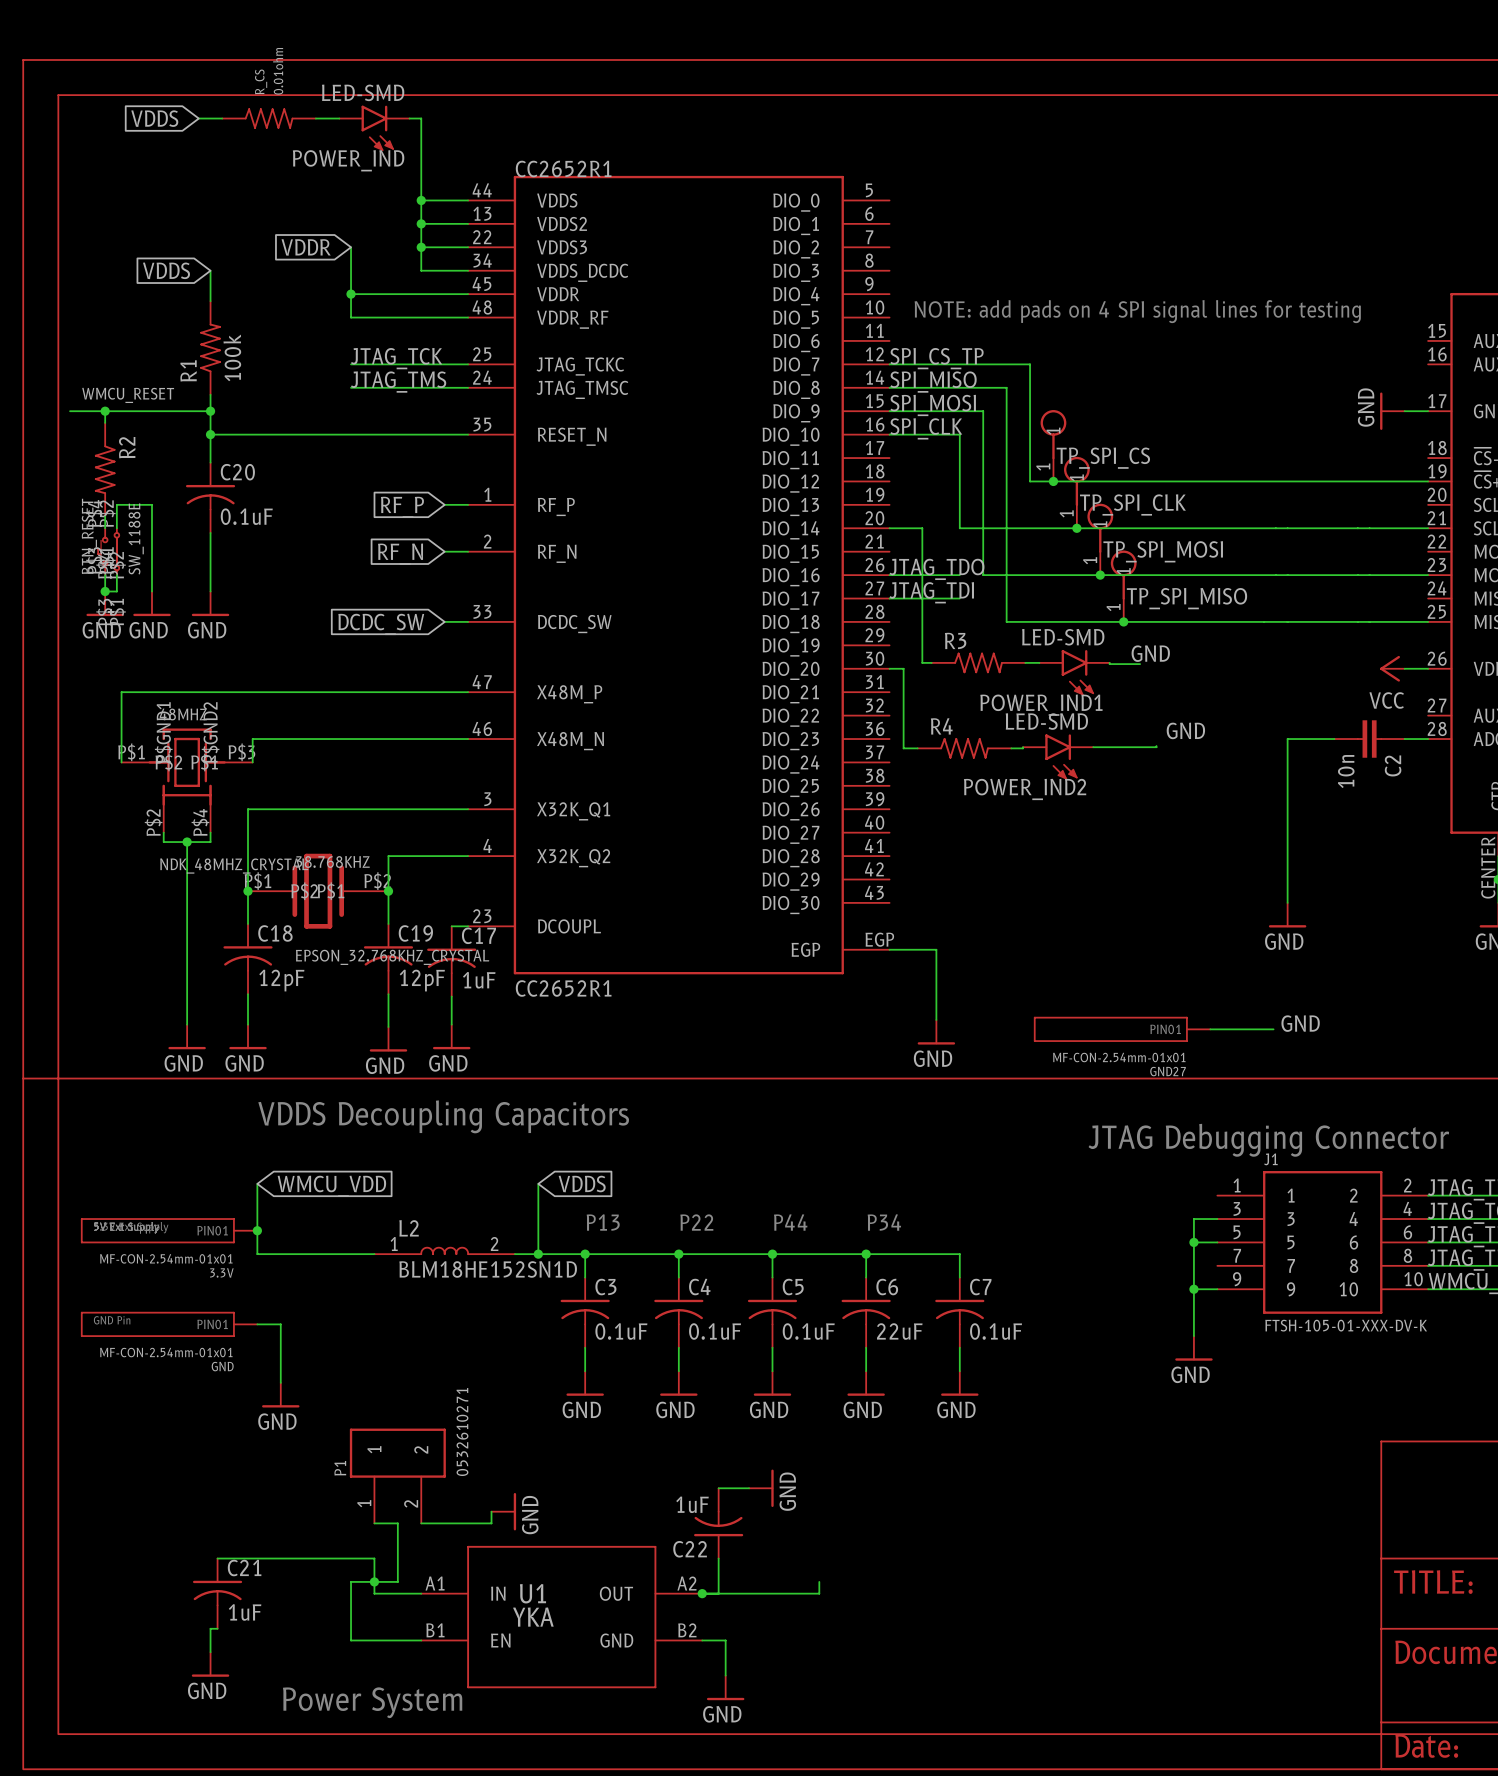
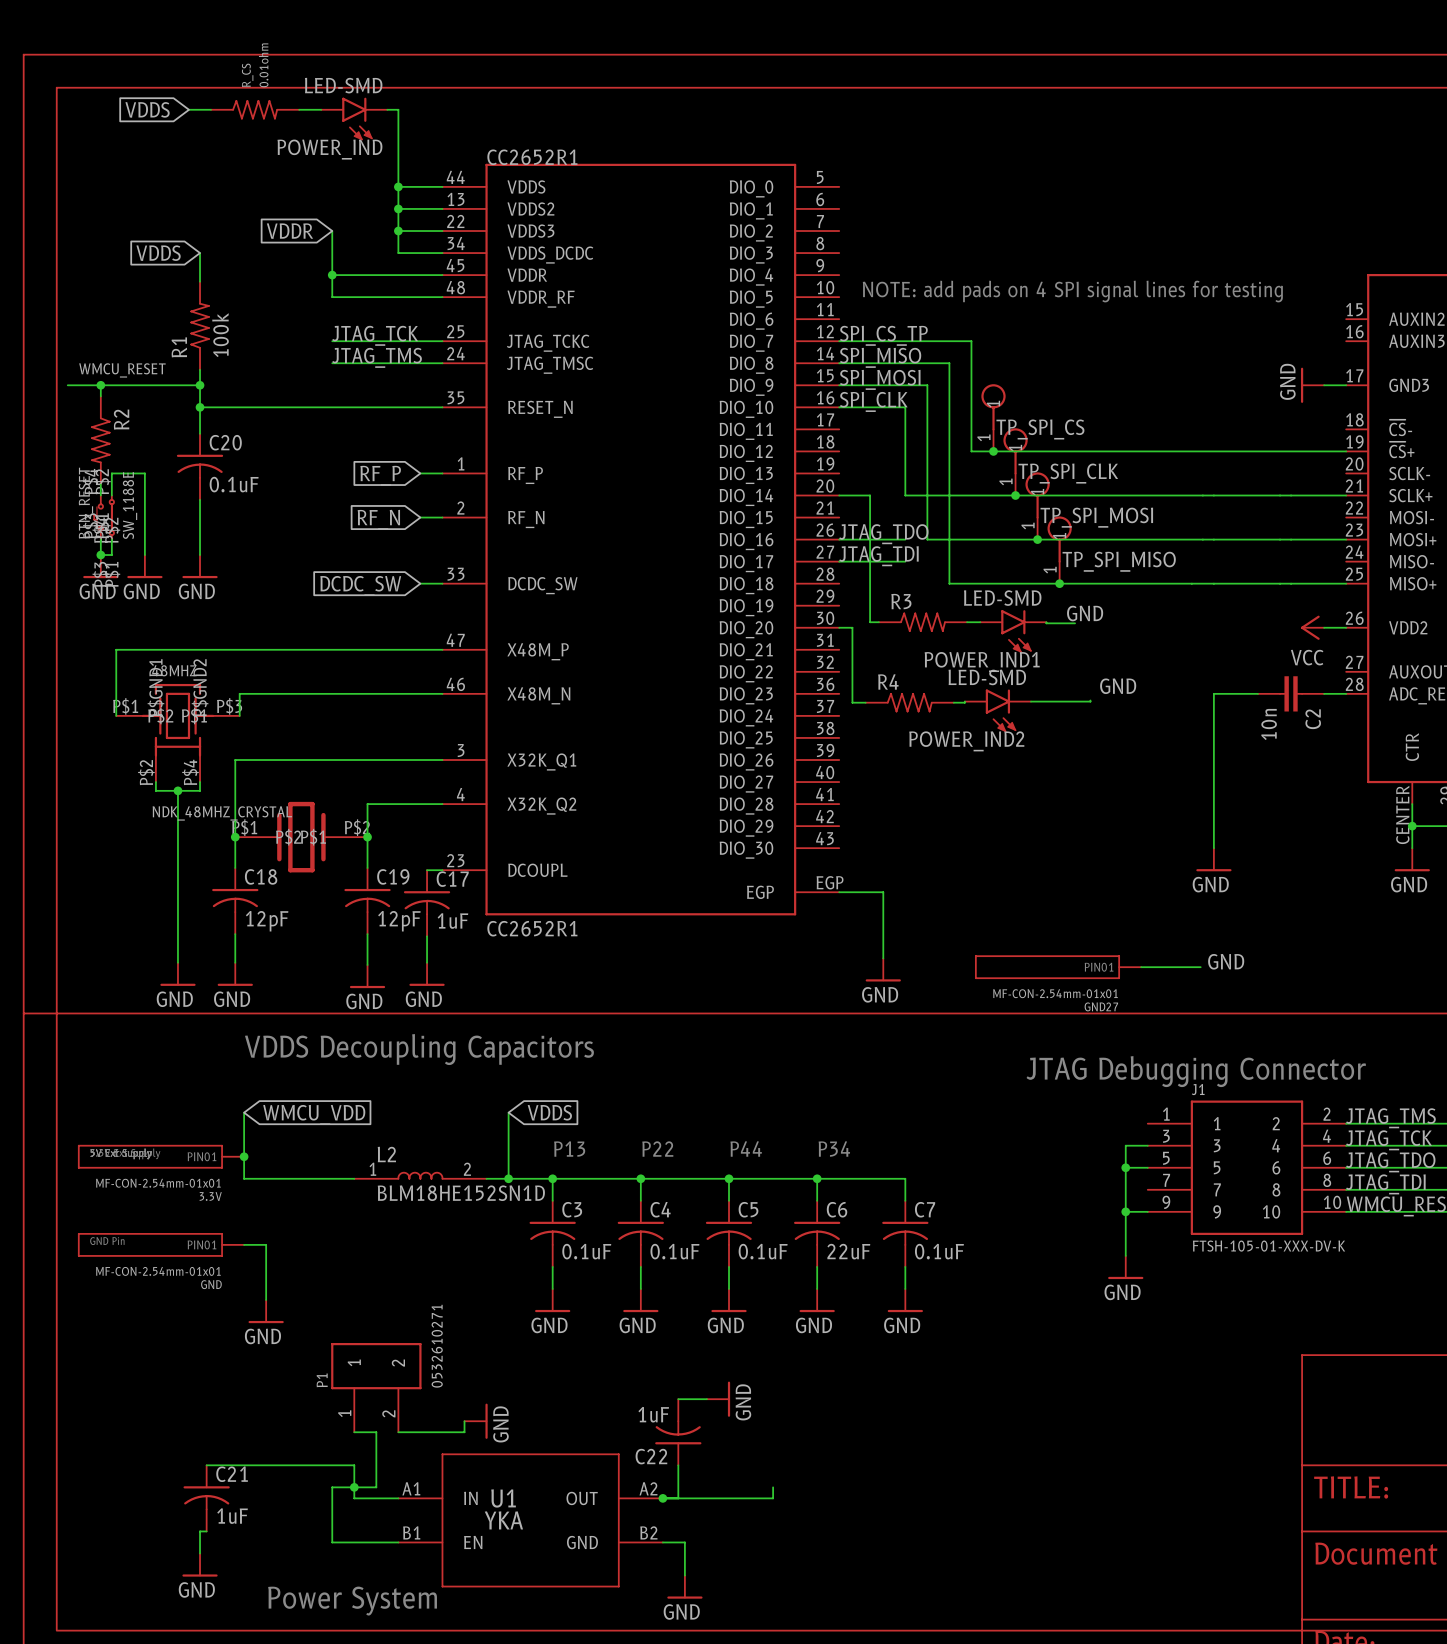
38.768KHZ name: 38.768KHZ (332, 862) -> none
38.768KHZ value: EPSON_32.768KHZ_CRYSTAL (392, 957) -> none

